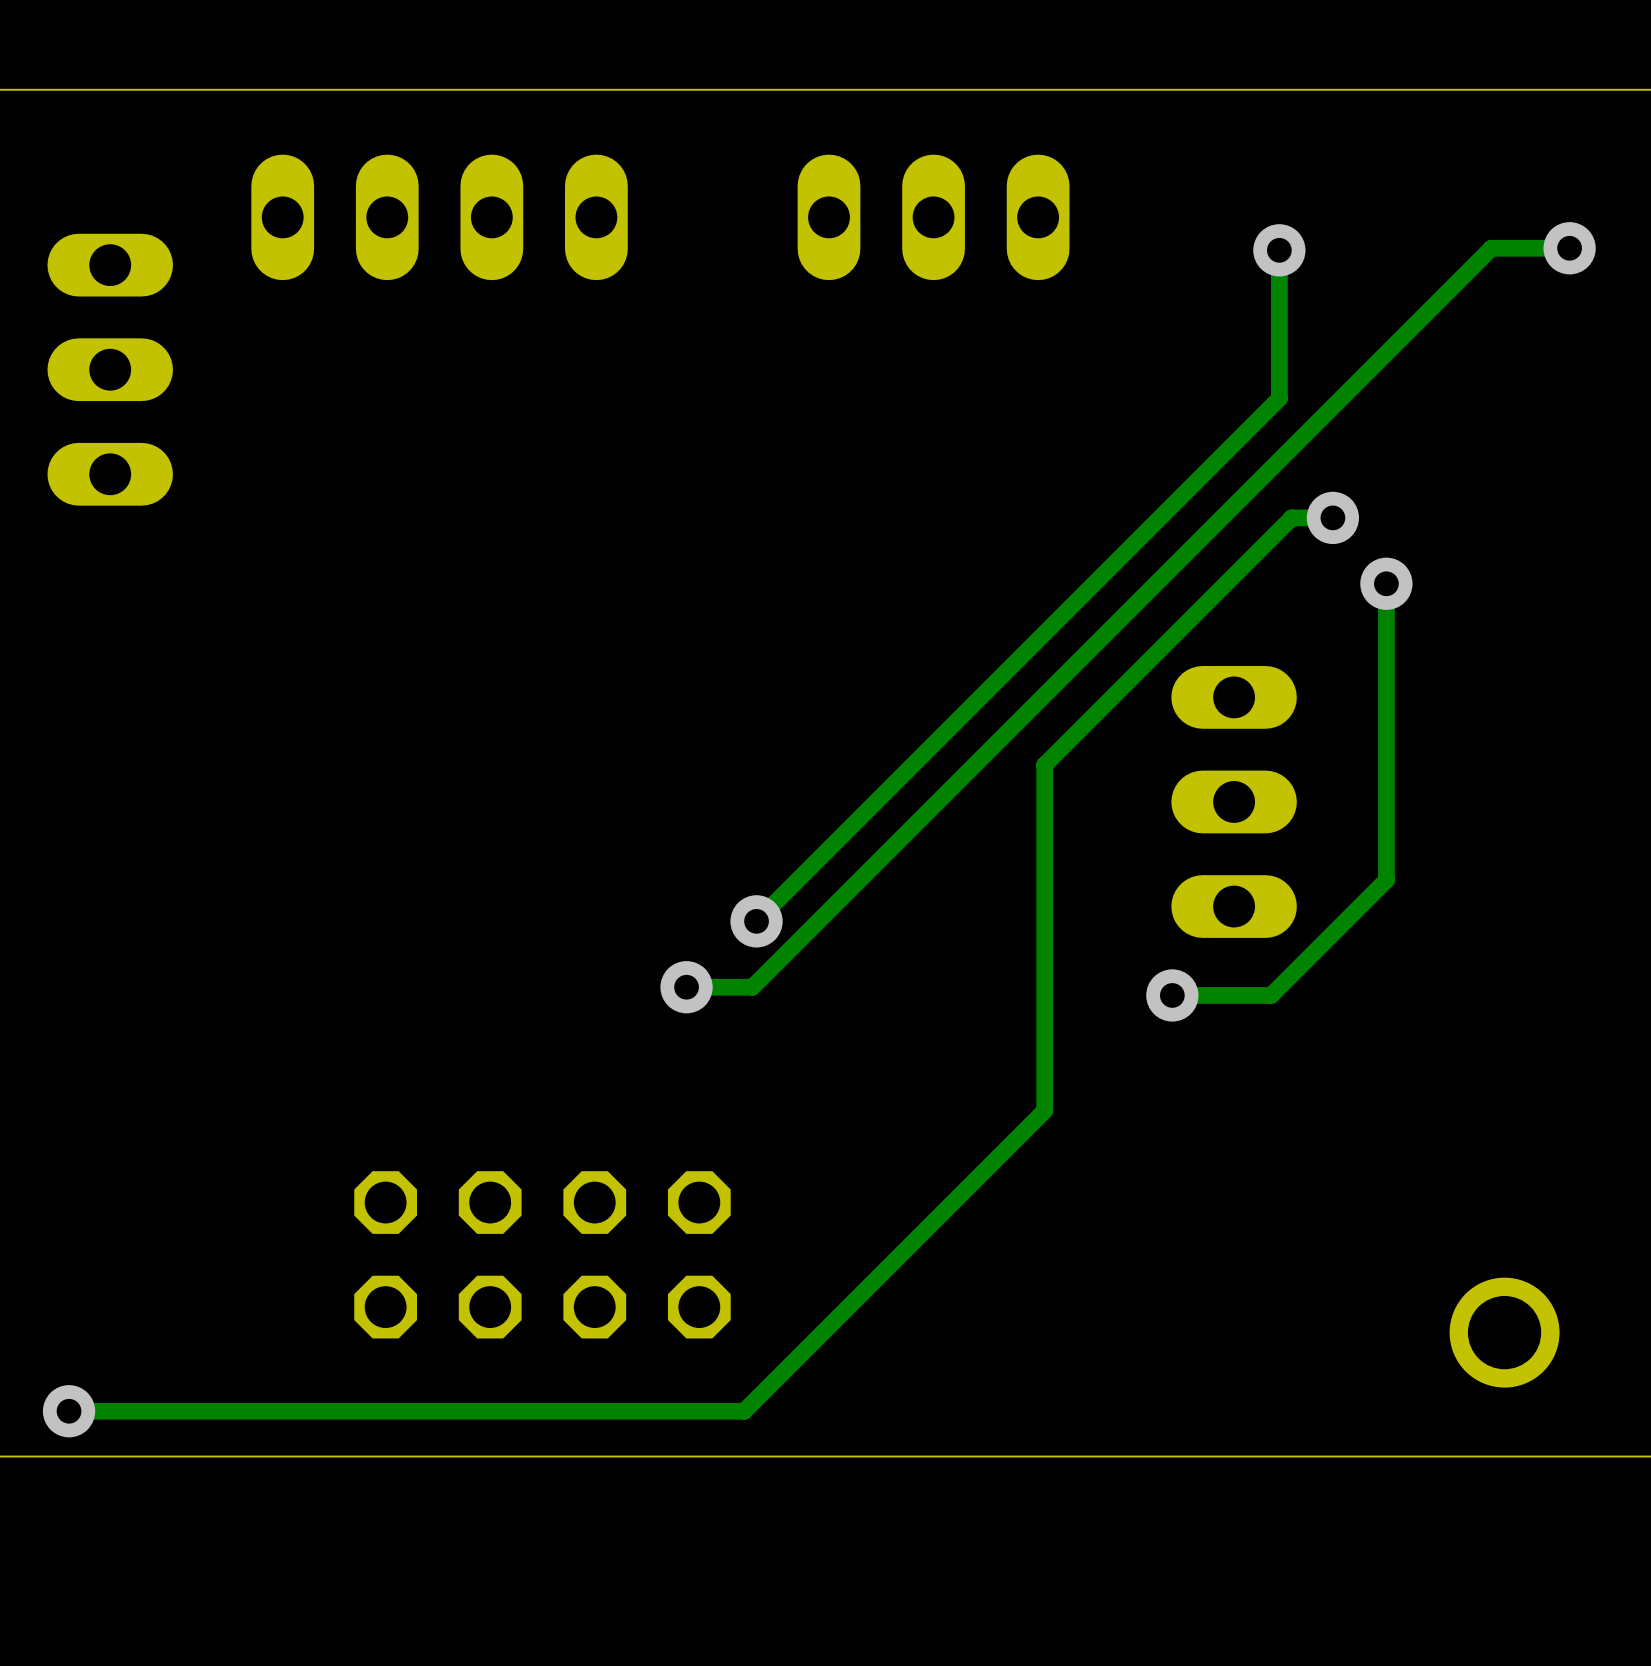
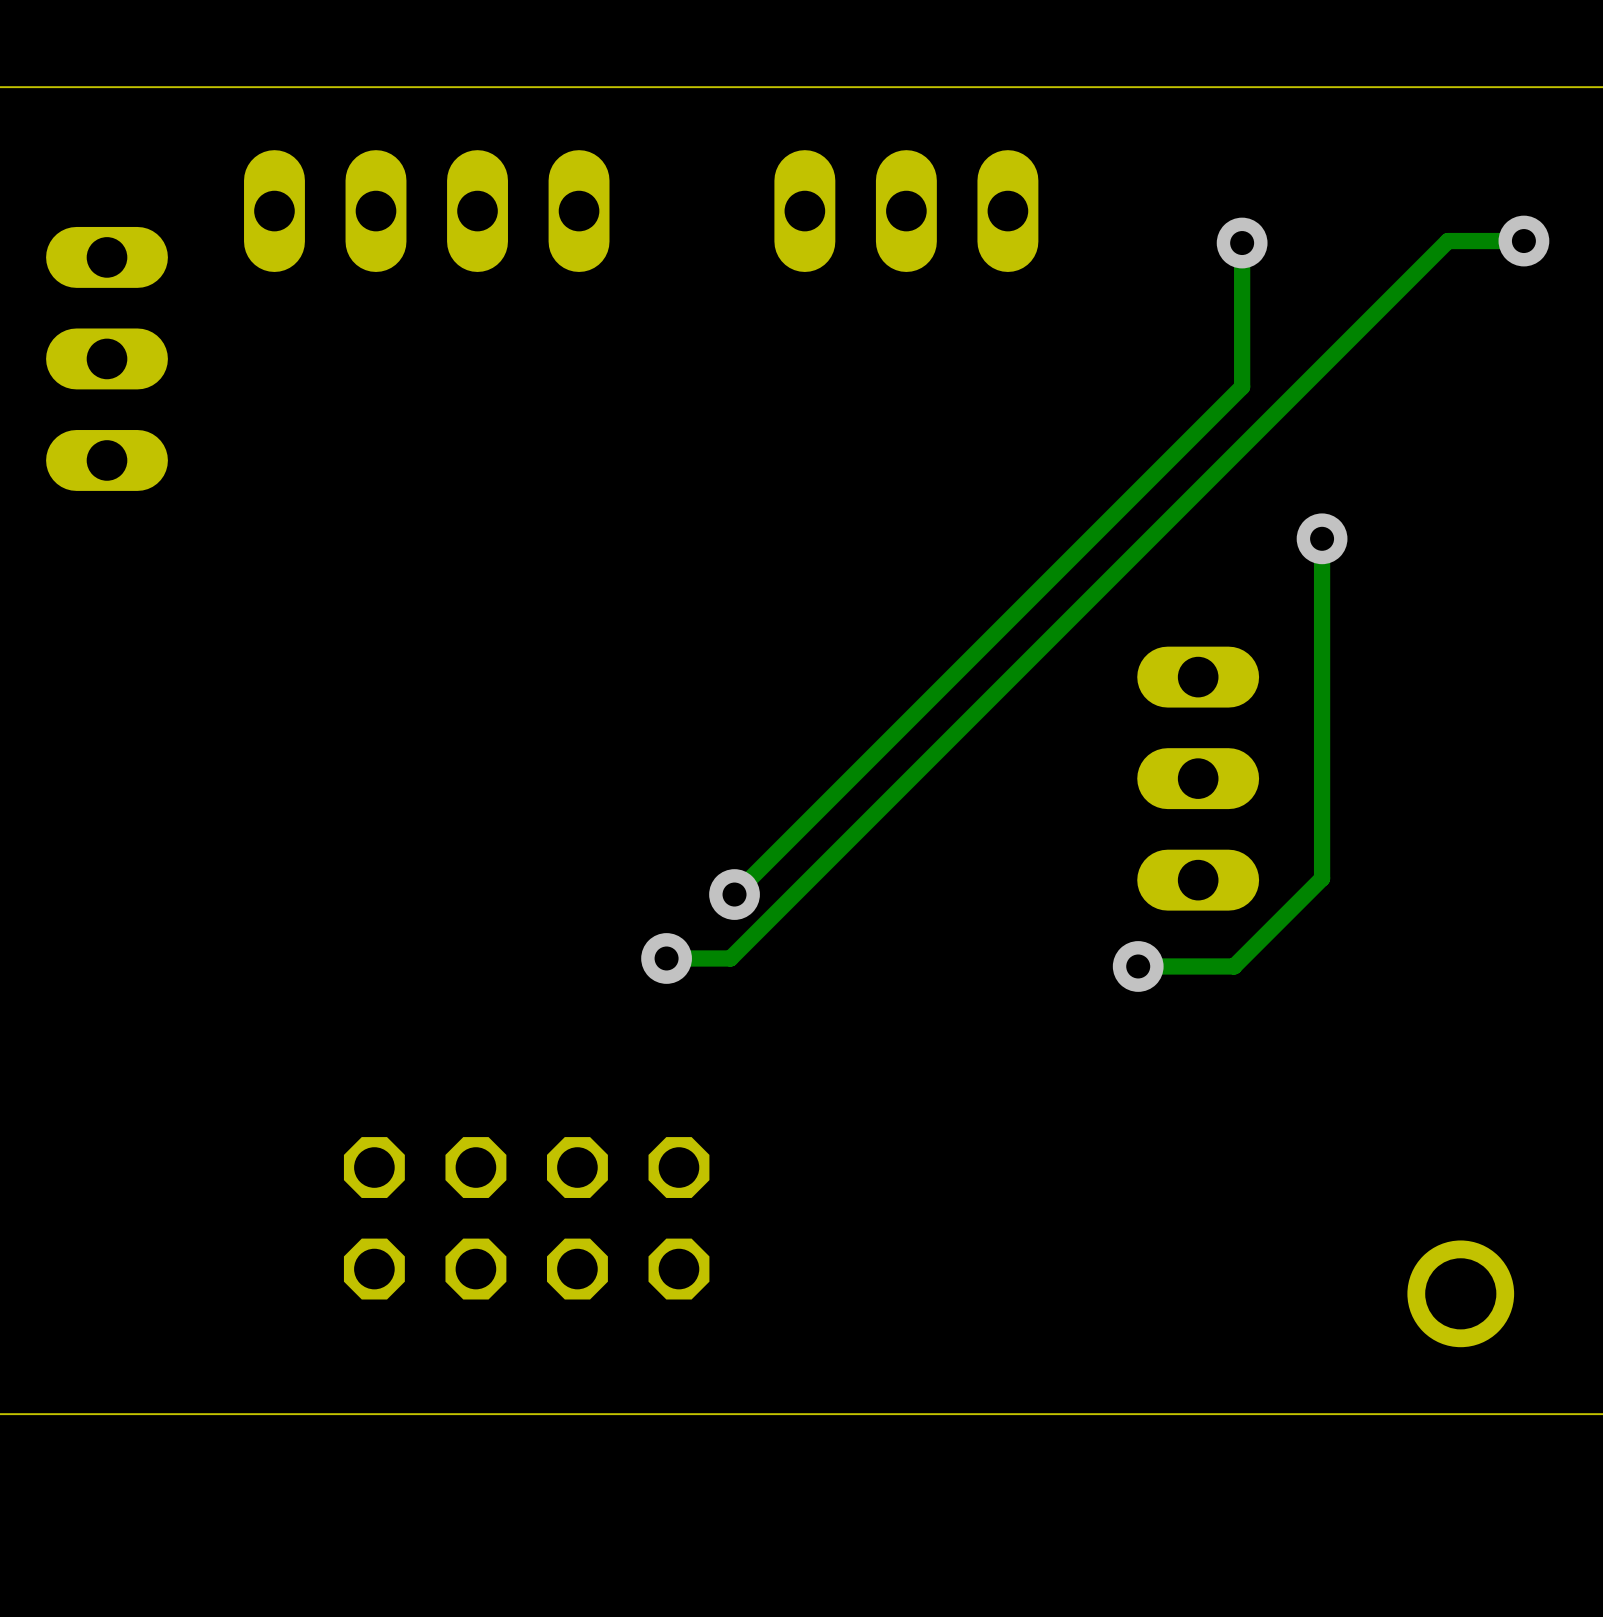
track: (1332, 517) (1291, 517) (1044, 764) (1044, 1110) (744, 1411) (69, 1411) -> none
via: (1332, 517) -> none
via: none -> (1322, 538)
track: (1386, 583) (1386, 880) (1361, 904) -> (1322, 538) (1322, 878)
via: (1386, 583) -> none
via: (69, 1411) -> none

